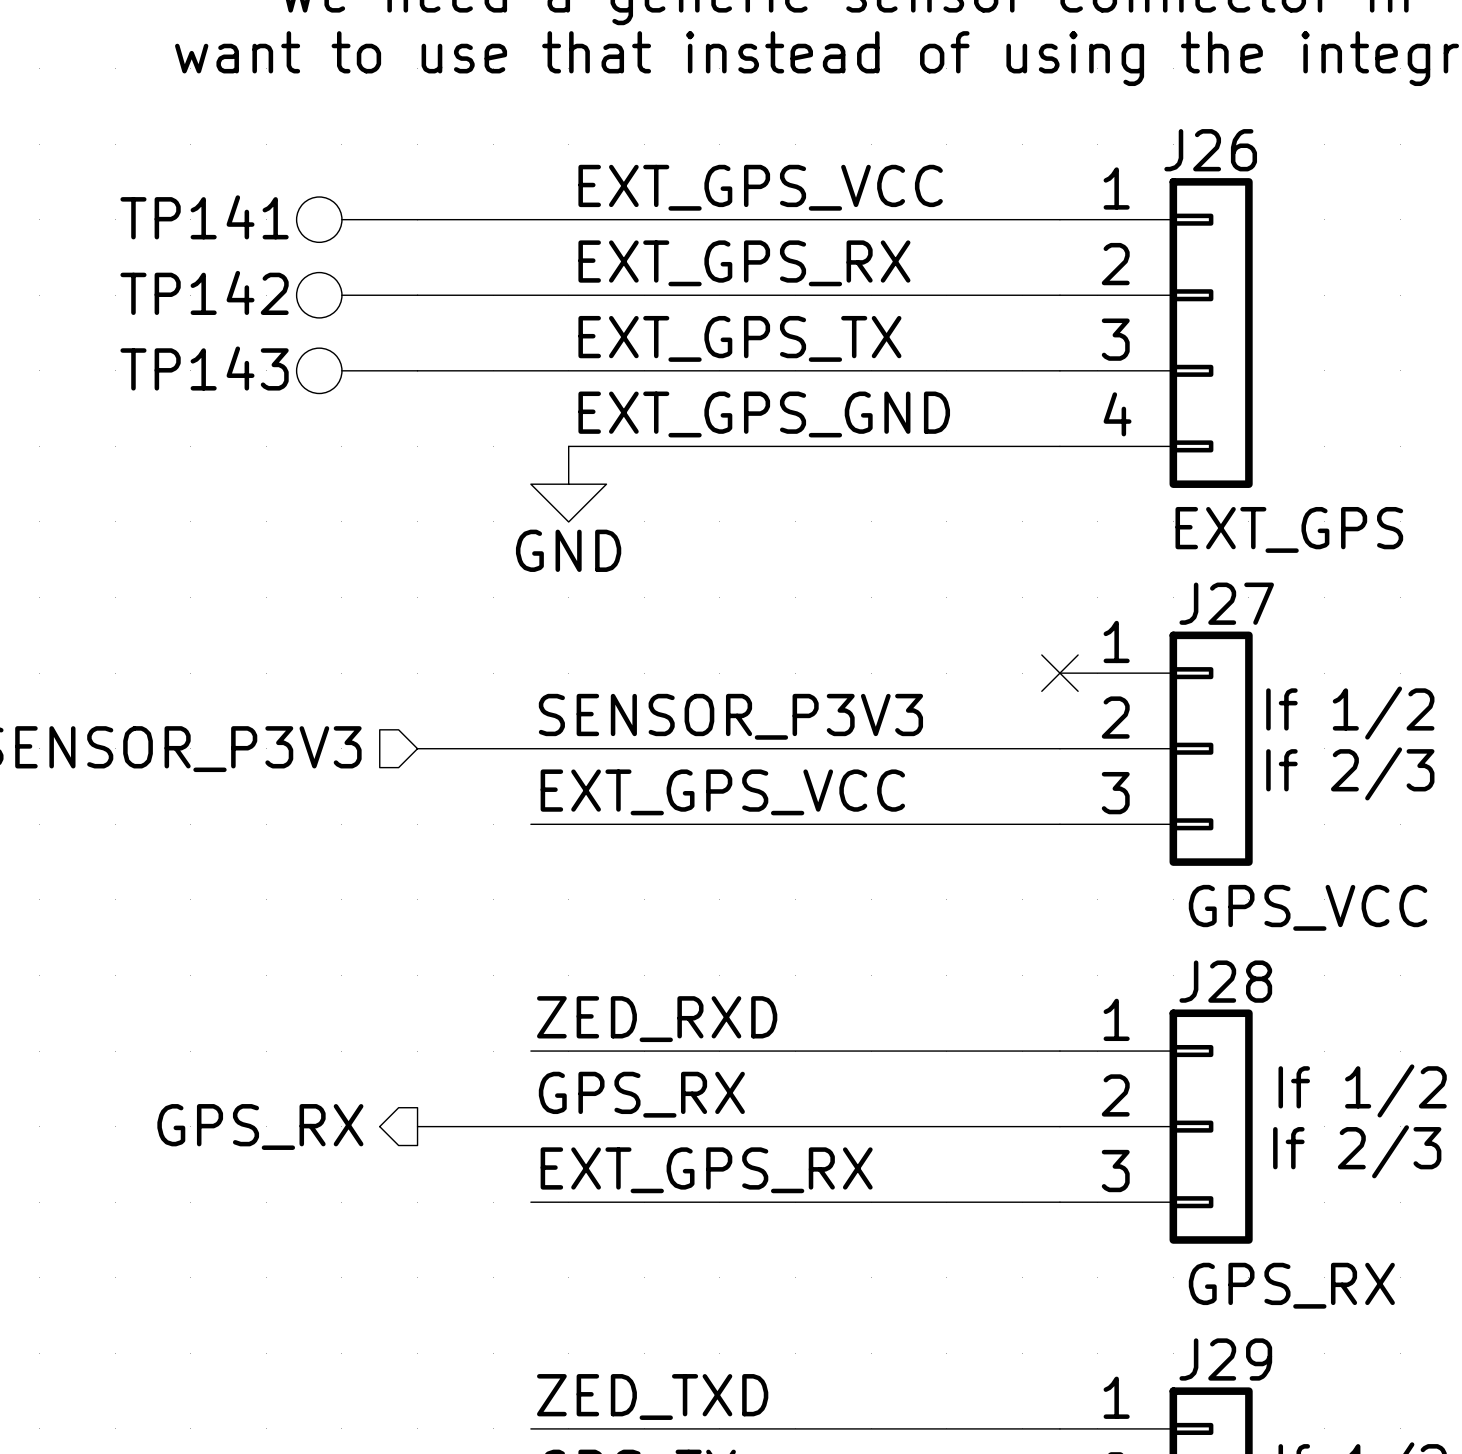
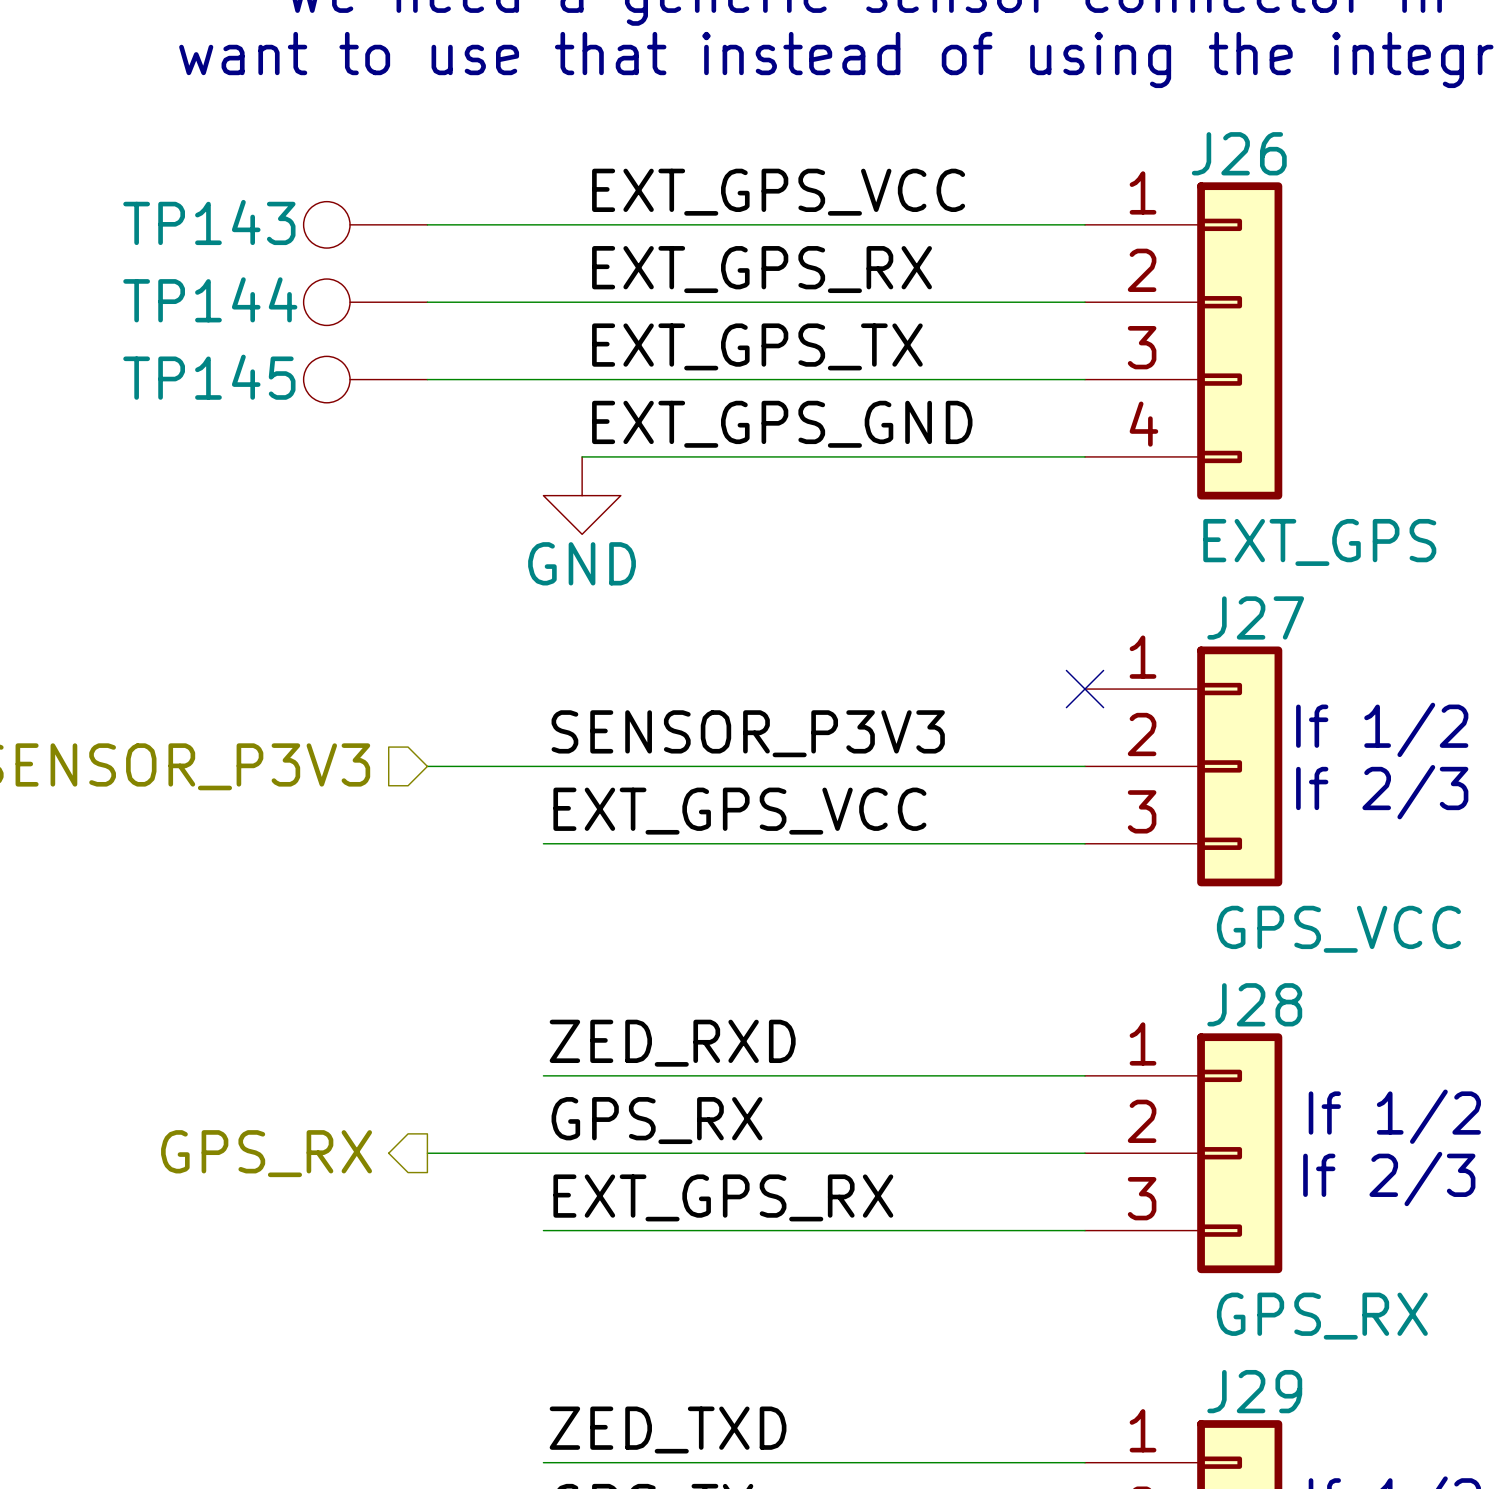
TP141 name: TP141 (204, 217) -> TP143 (209, 222)
TP142 name: TP142 (204, 292) -> TP144 (210, 299)
TP143 name: TP143 (204, 368) -> TP145 (209, 377)

